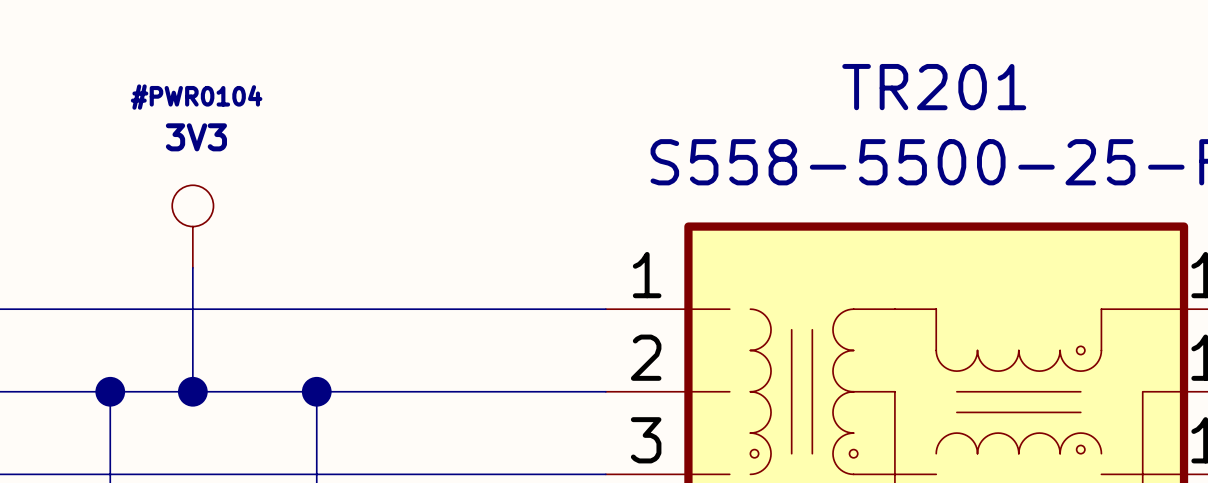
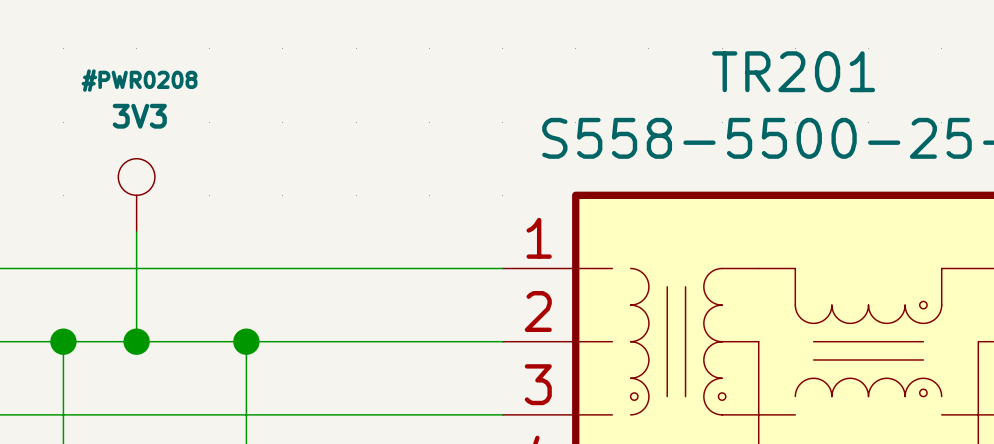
#PWR0104 name: #PWR0104 (196, 97) -> #PWR0208 (139, 80)

